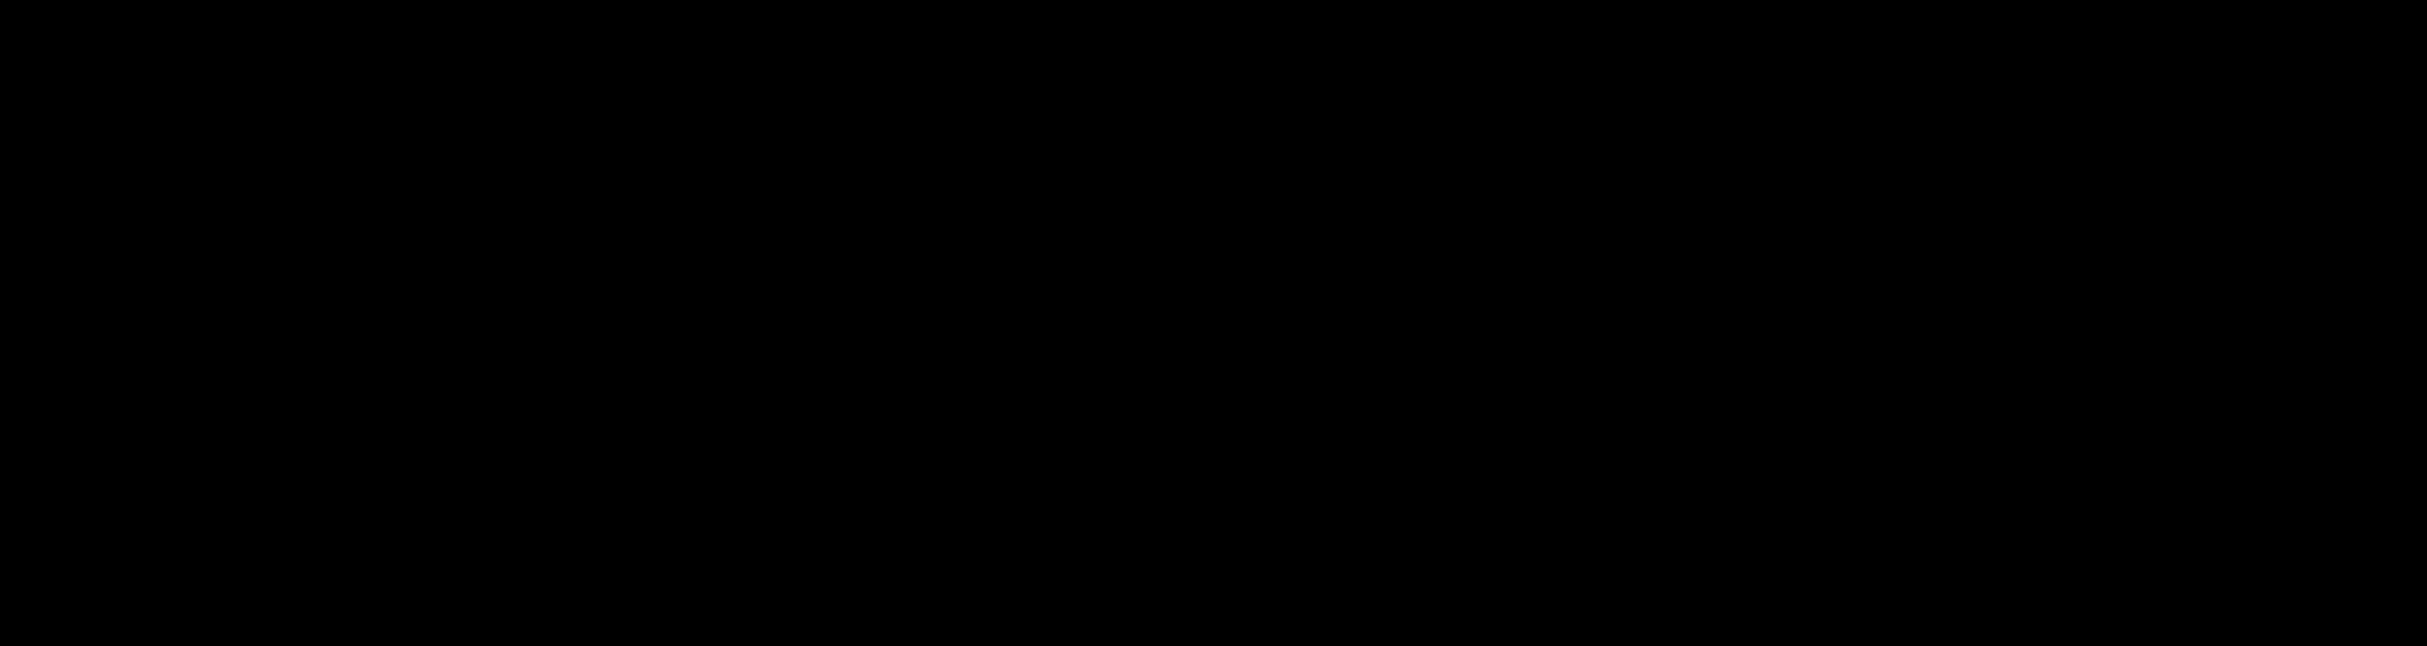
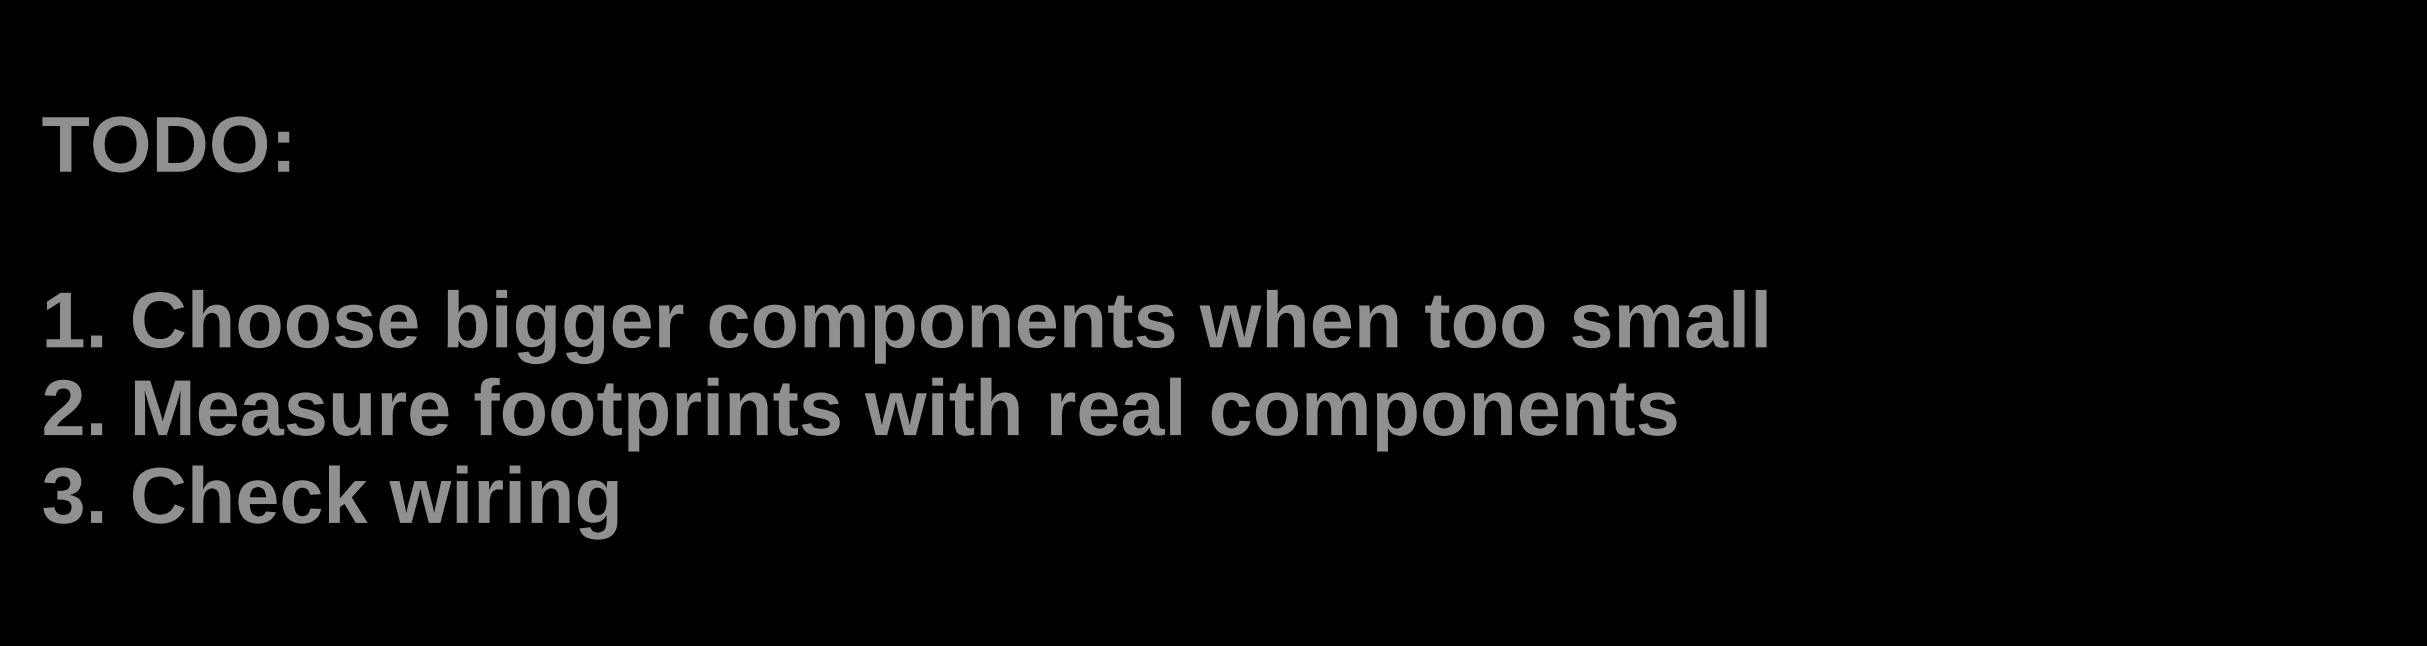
text: none -> TODO: (165, 144)
text: none -> 1. Choose bigger components when too small (906, 327)
text: none -> 2. Measure footprints with real components (860, 414)
text: none -> 3. Check wiring (330, 502)

